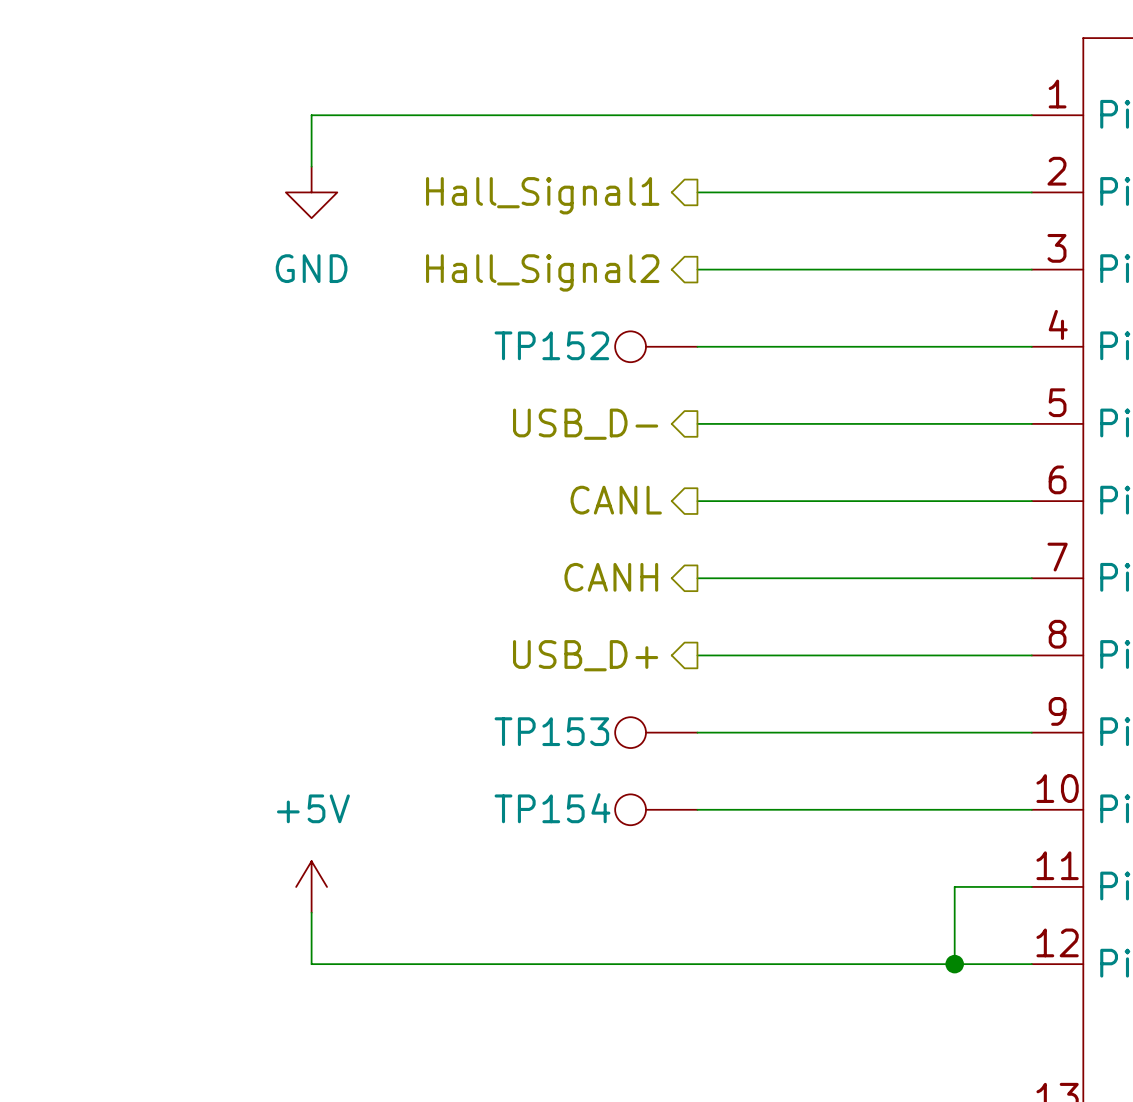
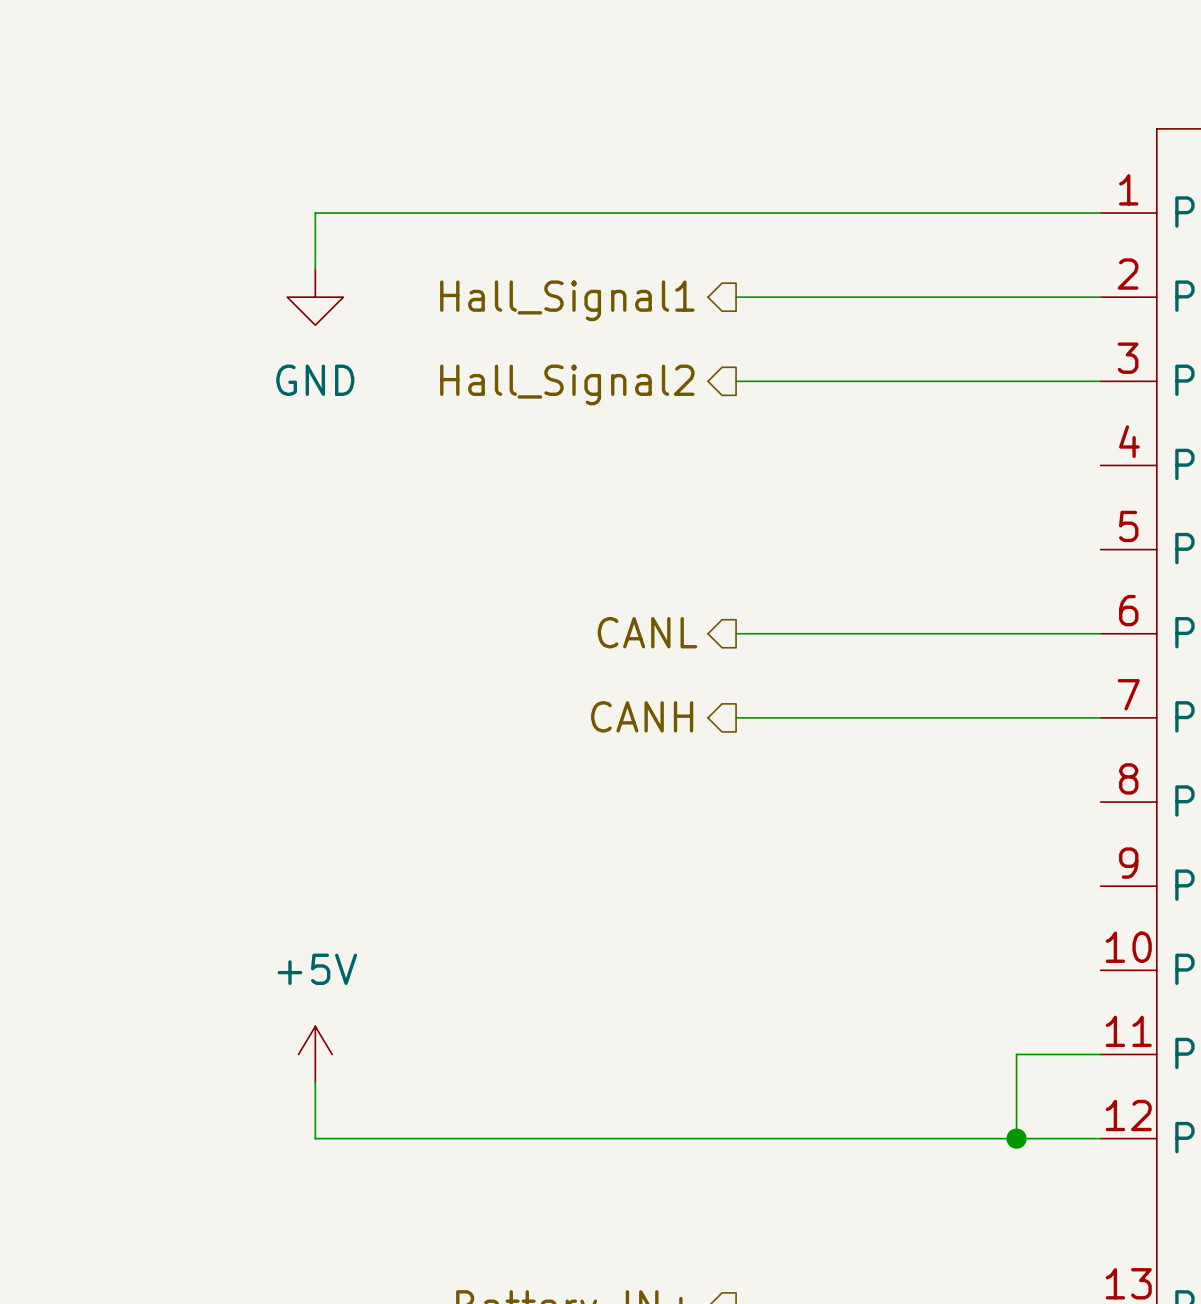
TP152: (656, 346) -> none
wire: (697, 346) (1031, 346) -> none
wire: (697, 423) (1031, 423) -> none
hierarchical label: USB_D- (585, 424) -> none
hierarchical label: USB_D+ (585, 655) -> none
wire: (697, 655) (1031, 655) -> none
TP153: (656, 732) -> none
wire: (697, 732) (1031, 732) -> none
TP154: (656, 809) -> none
wire: (697, 809) (1031, 809) -> none

